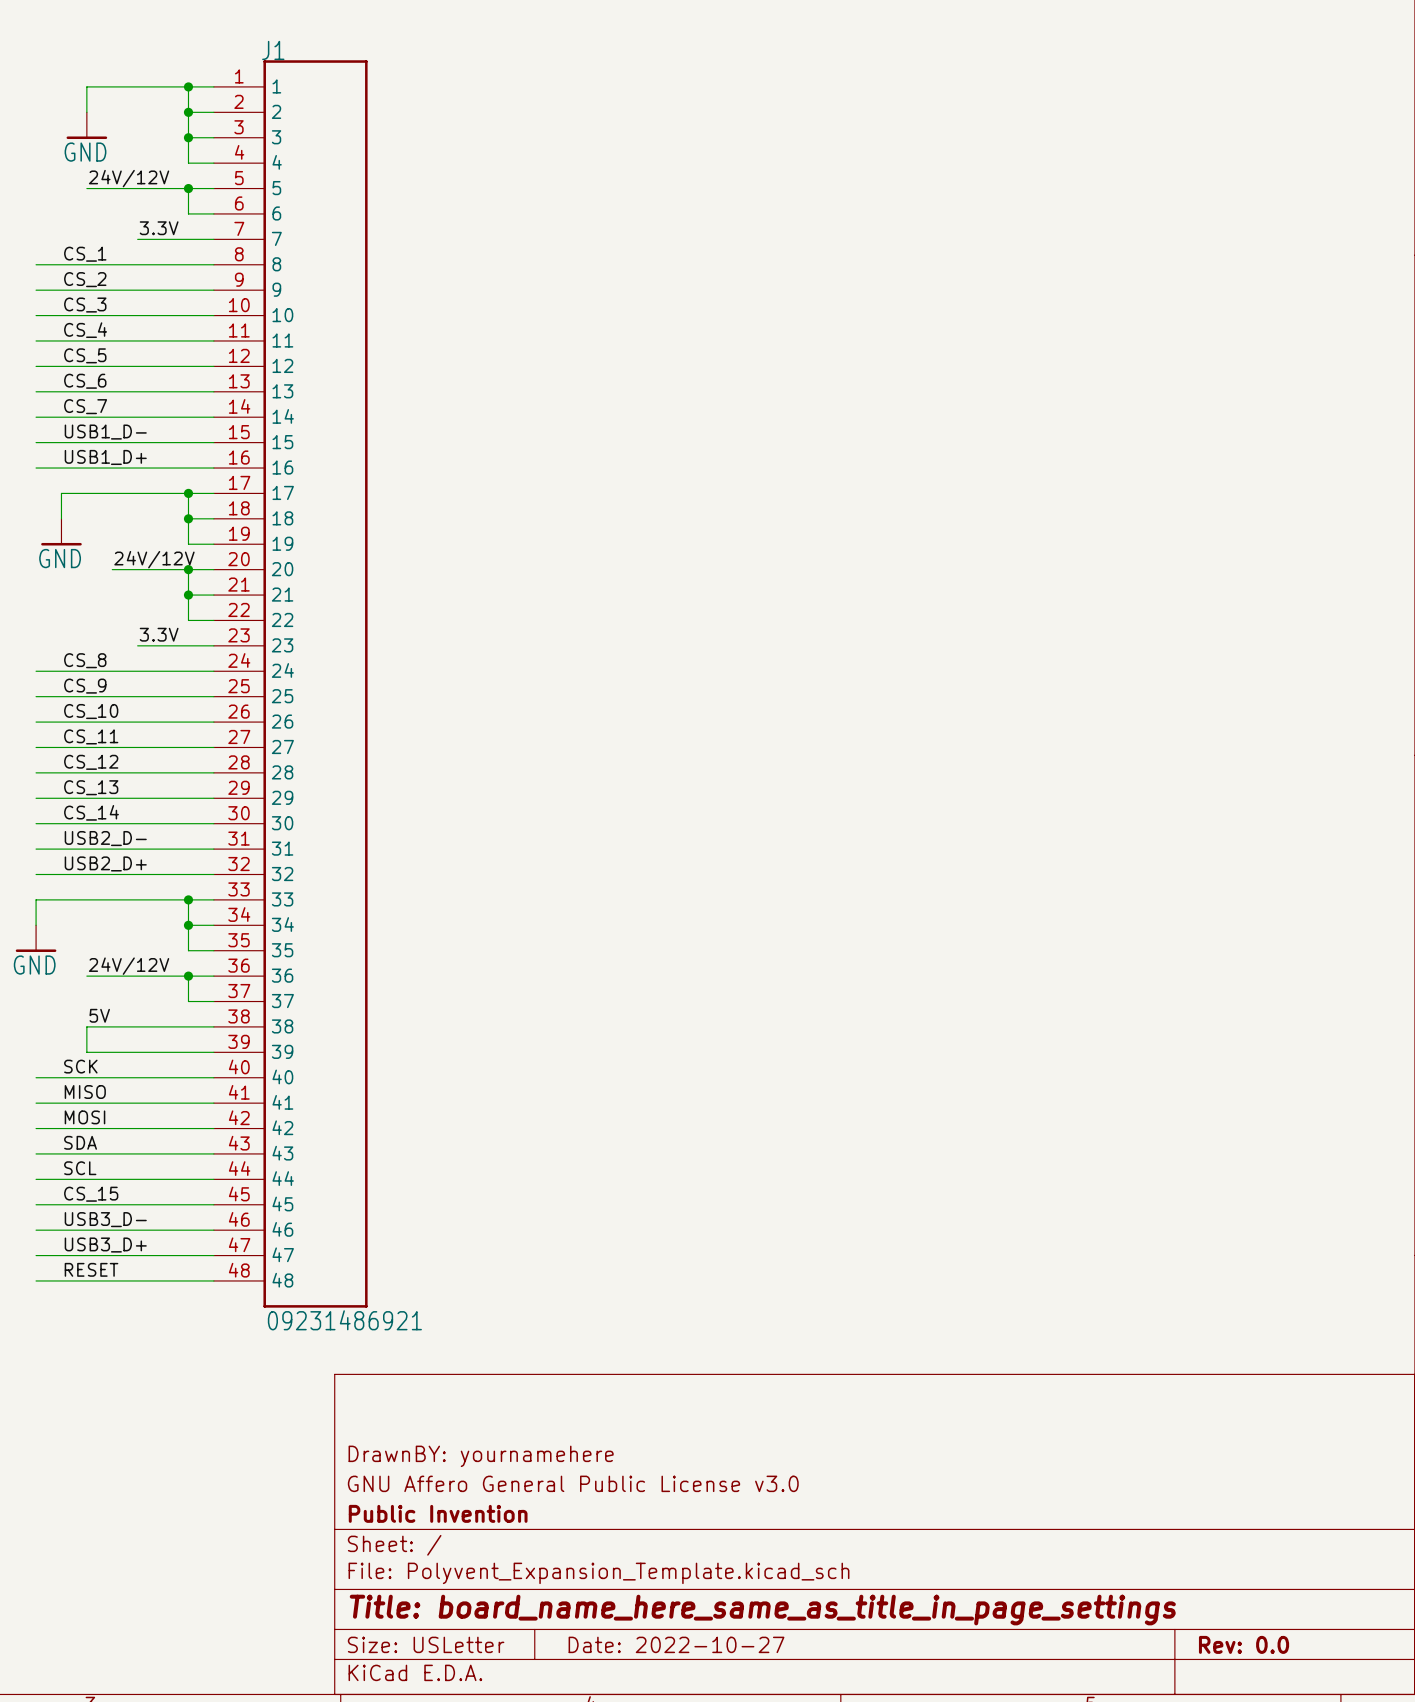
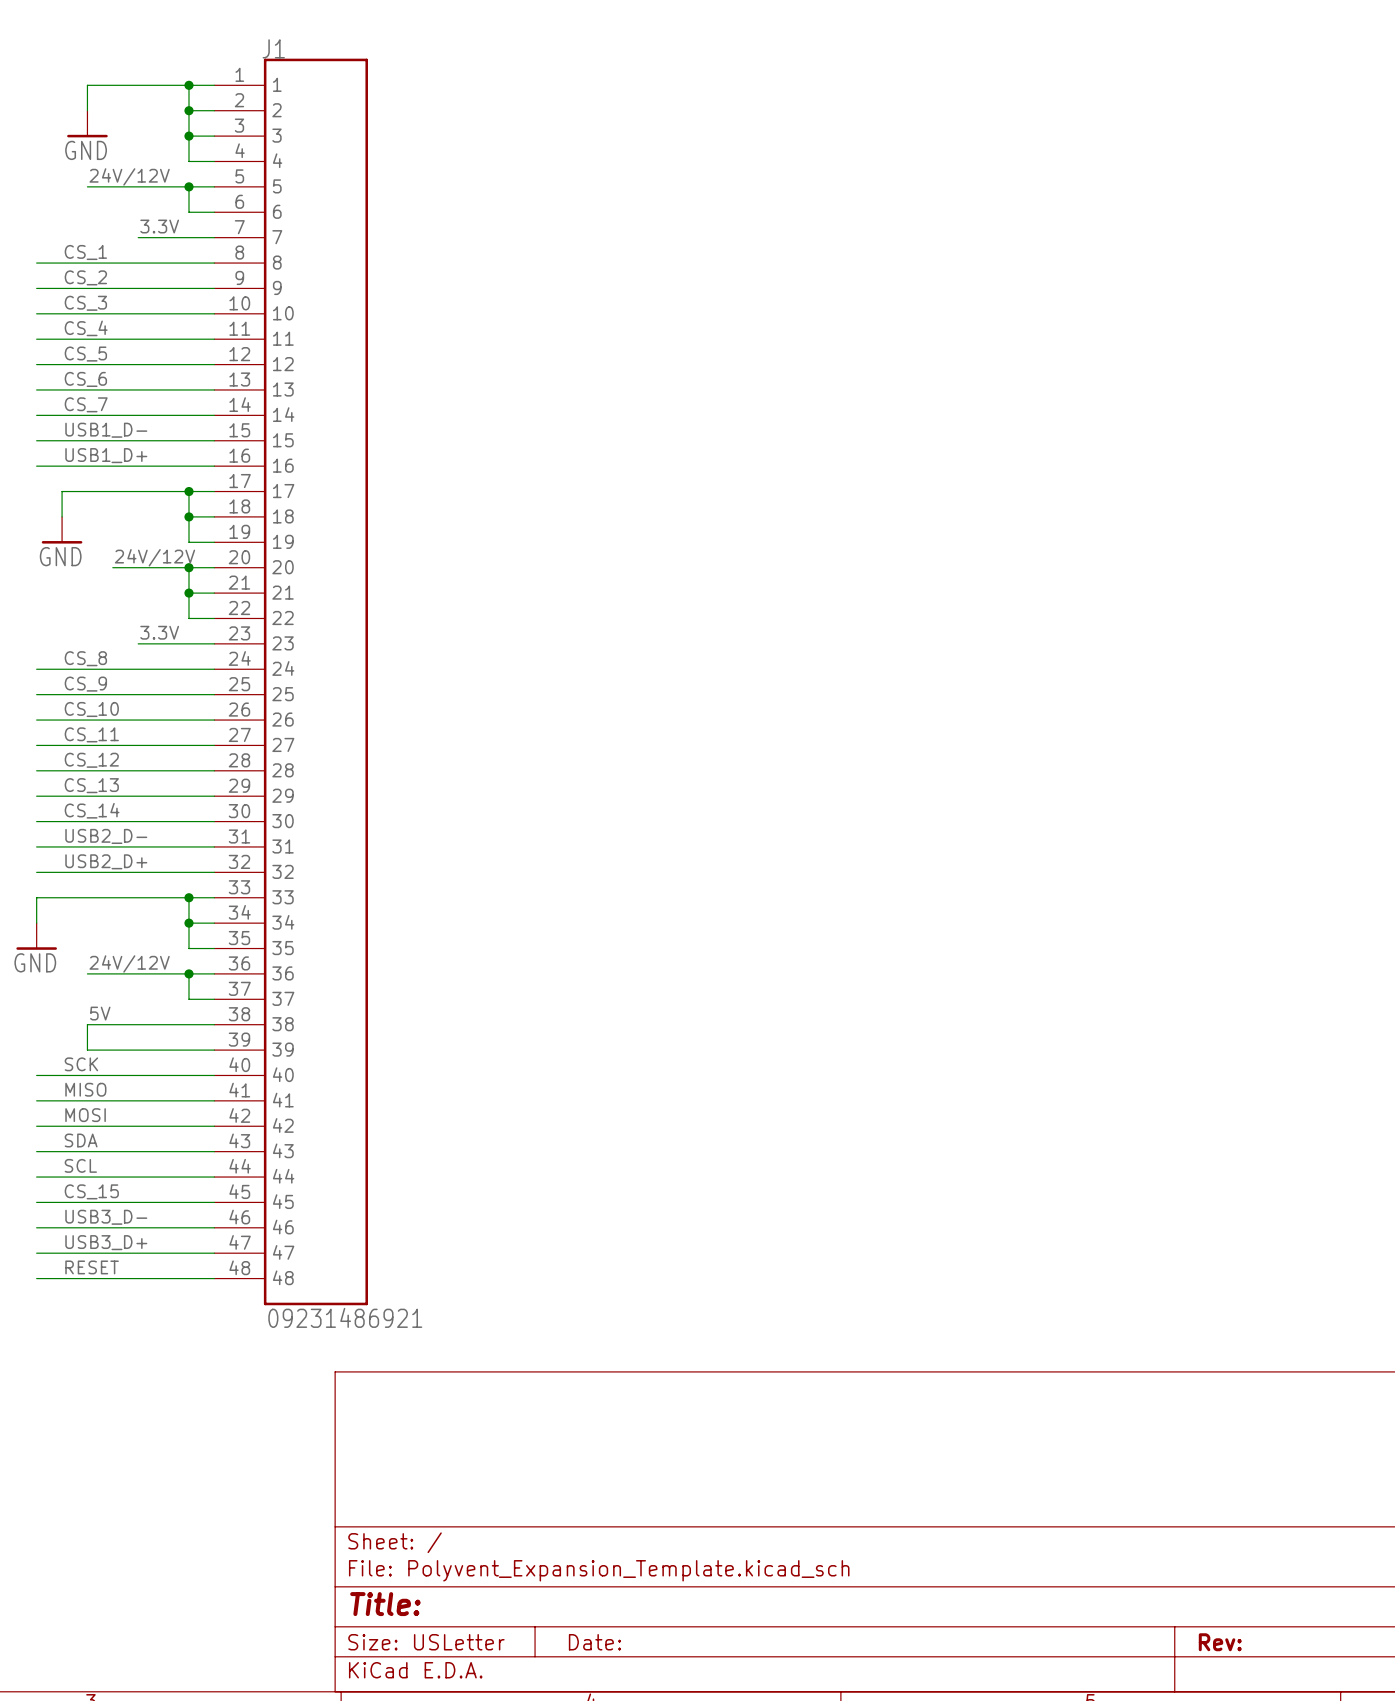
title block: DrawnBY: yournamehere (481, 1456) -> none
title block: GNU Affero General Public License v3.0 (573, 1483) -> none
title block: Public Invention (438, 1513) -> none
title block: Title: board_name_here_same_as_title_in_page_settings (762, 1610) -> Title: (385, 1604)
title block: Date: 2022-10-27 (676, 1644) -> Date: (594, 1642)
title block: Rev: 0.0 (1244, 1644) -> Rev: (1220, 1642)

